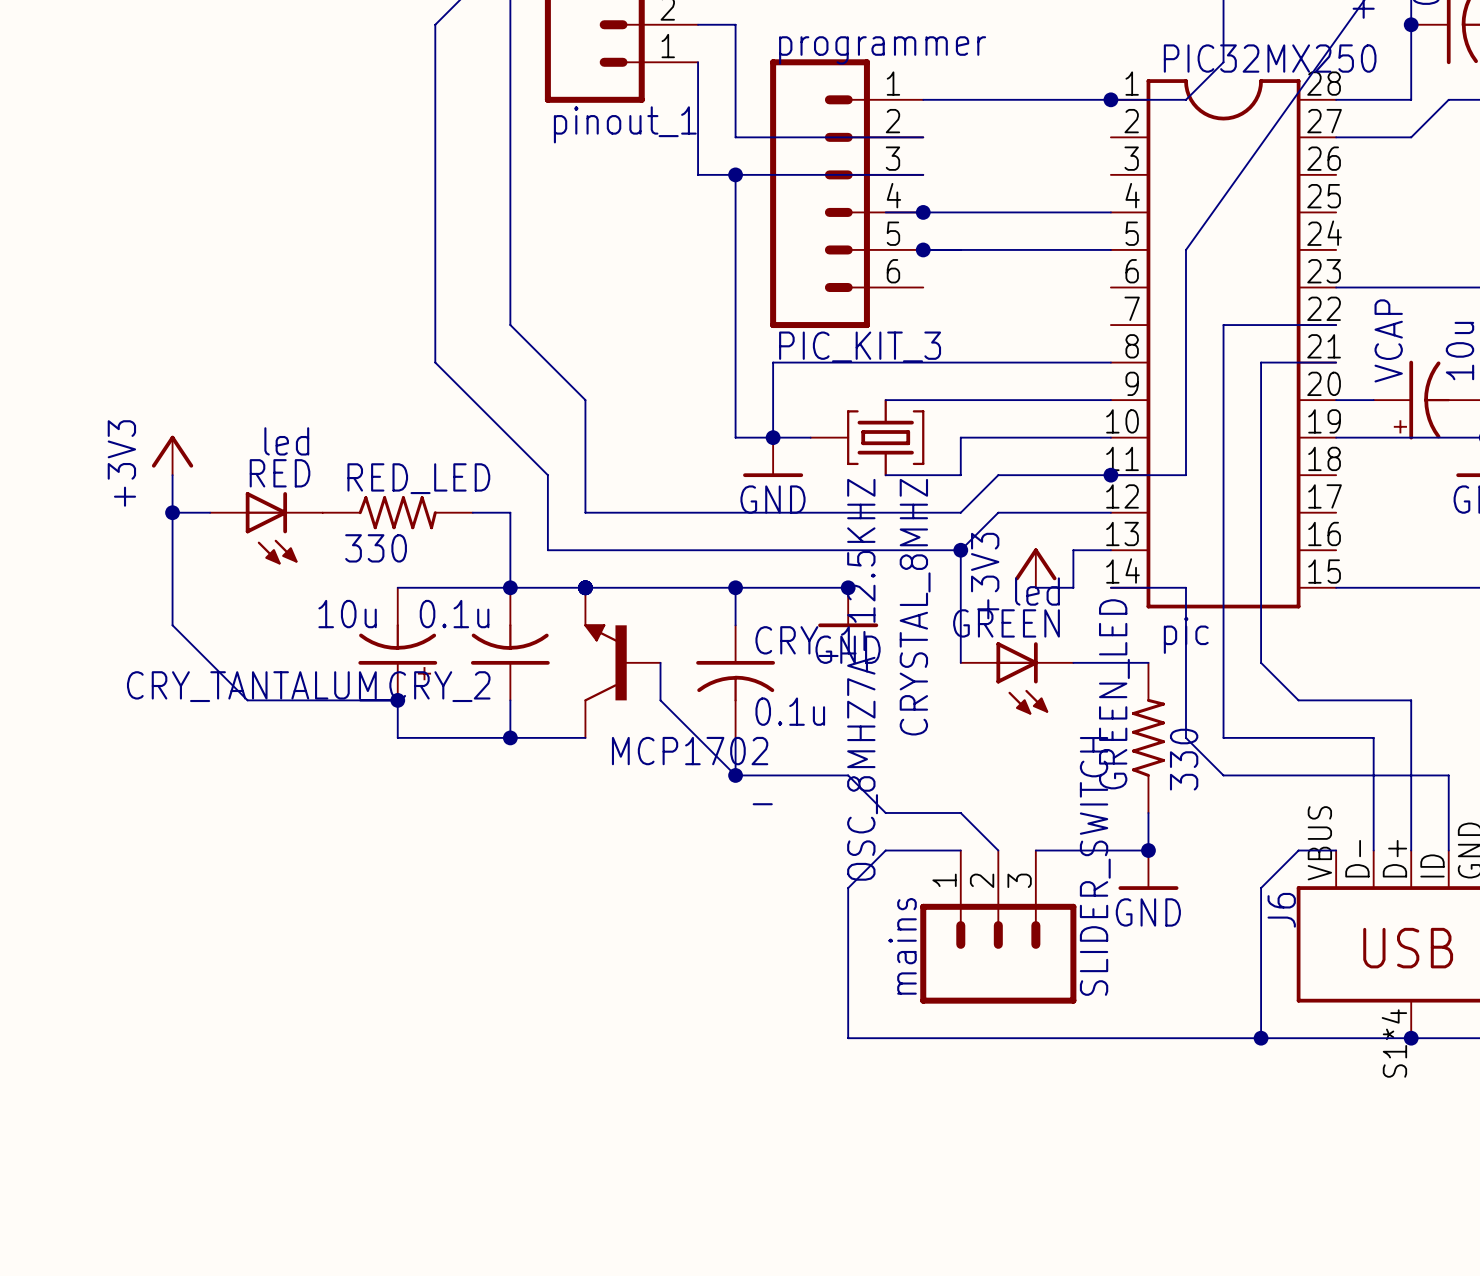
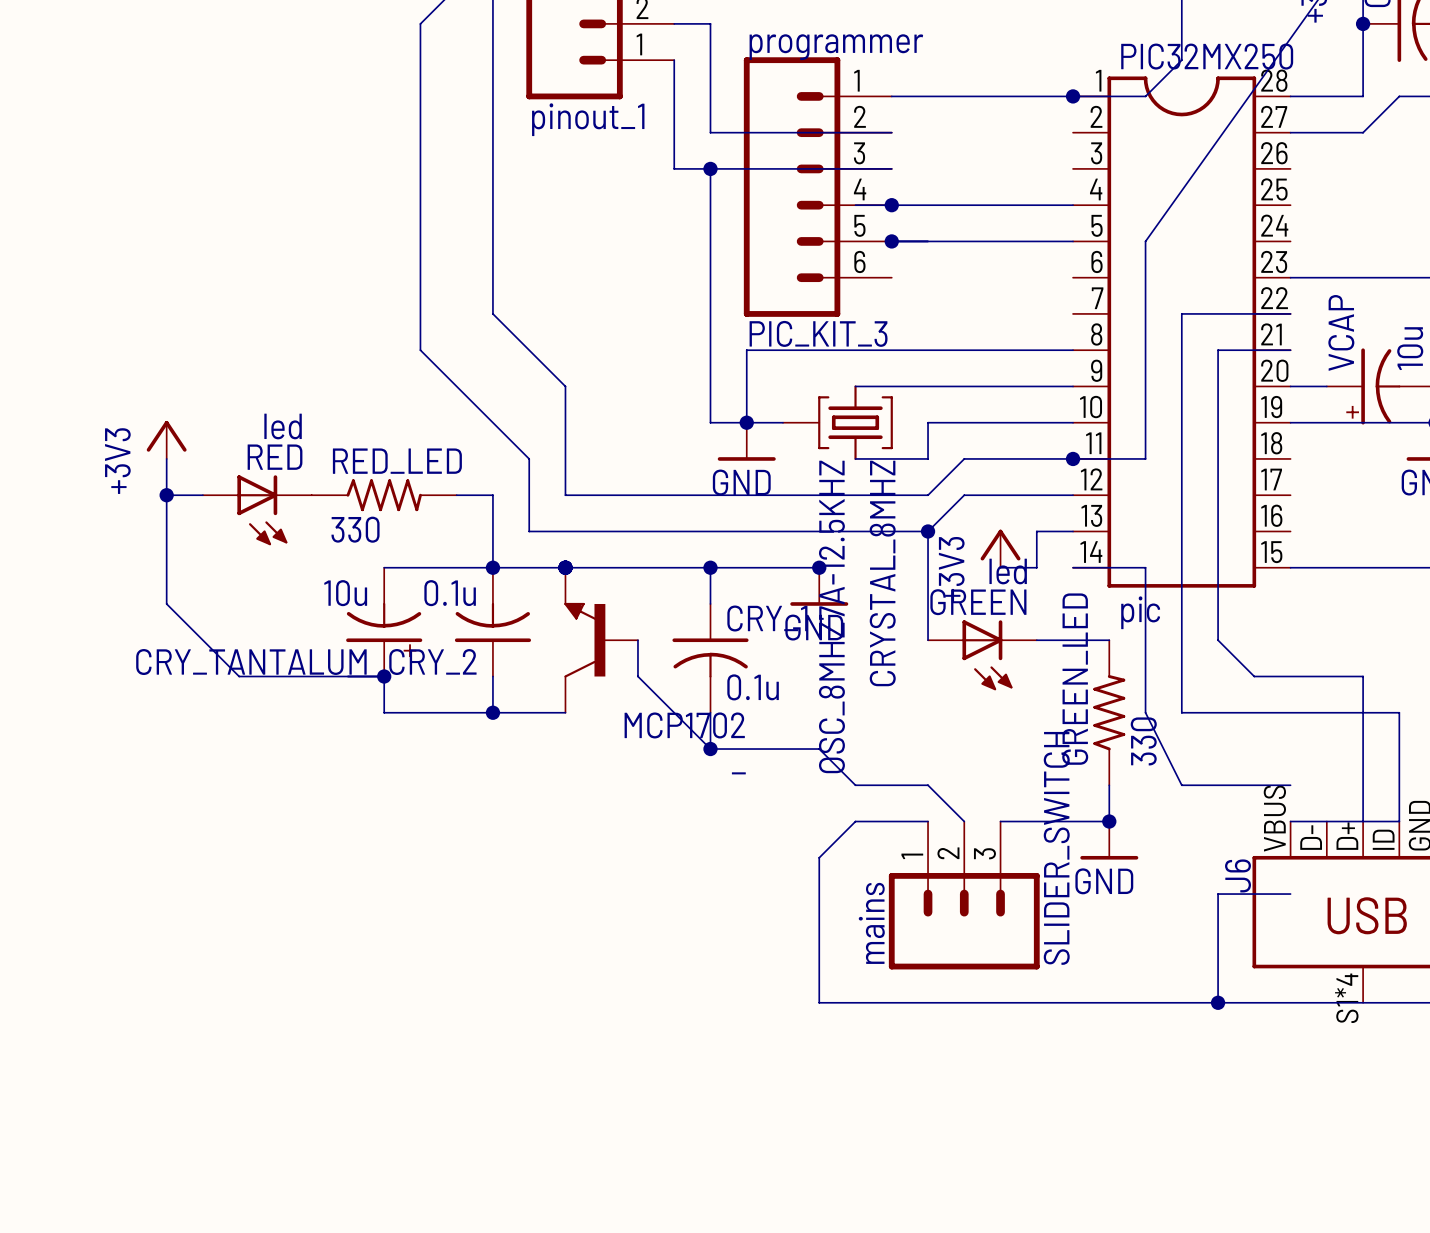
wire: (1185, 737) (1223, 775) (1448, 775) -> (1145, 712) (1181, 785) (1290, 785)
wire: (1373, 737) (1373, 850) -> (1326, 712) (1399, 712) (1399, 749)
wire: (1336, 850) (1298, 850) (1261, 888) (1261, 925) -> (1290, 894) (1218, 894)
wire: none -> (1290, 821) (1399, 821)
junction: (1411, 1038) -> none

